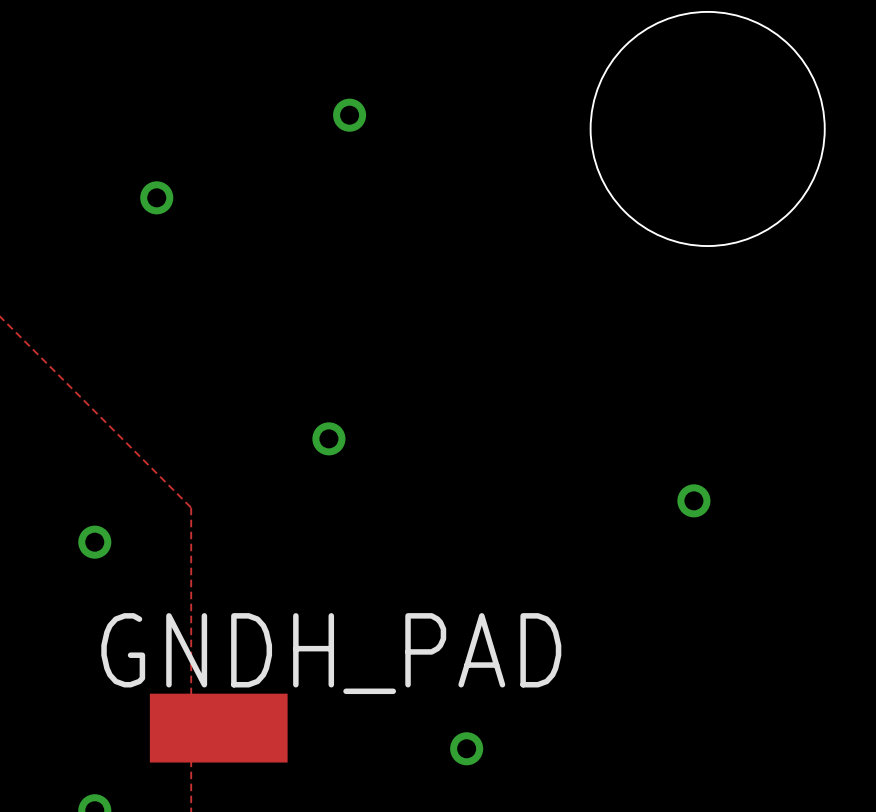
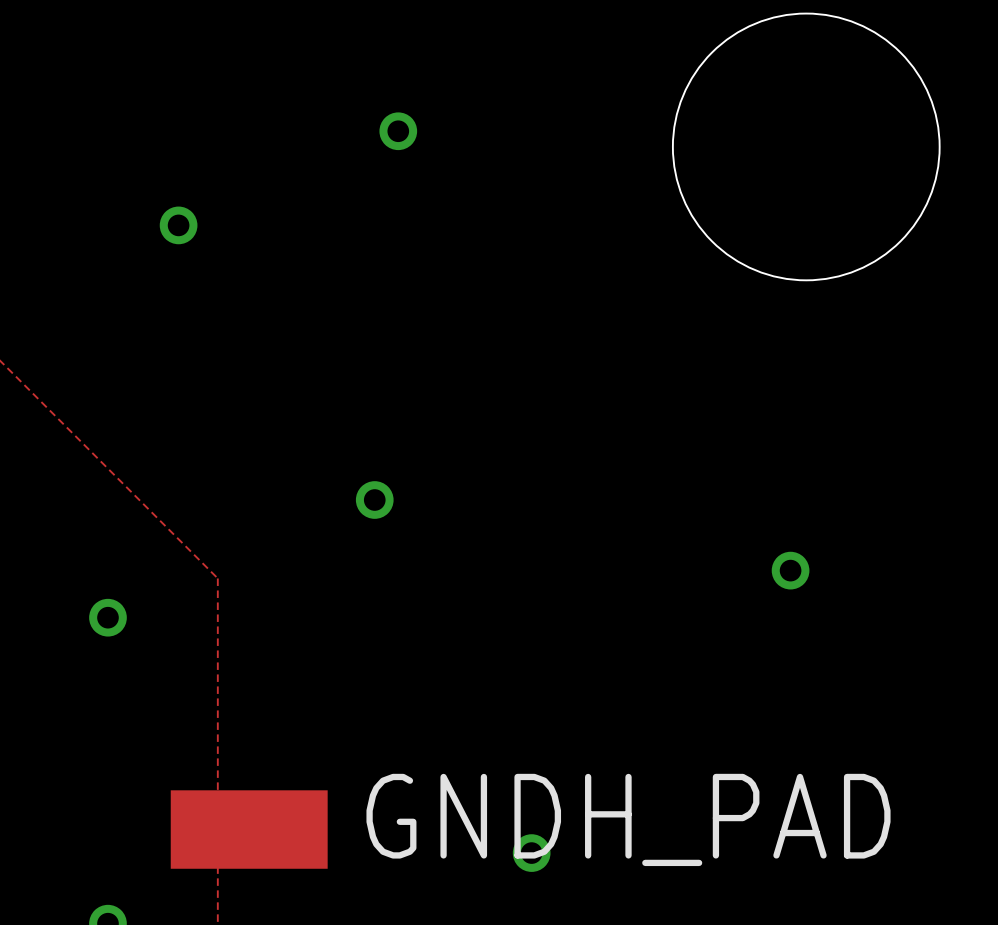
GNDH_PAD name position: GNDH_PAD (331, 653) -> GNDH_PAD (628, 819)

